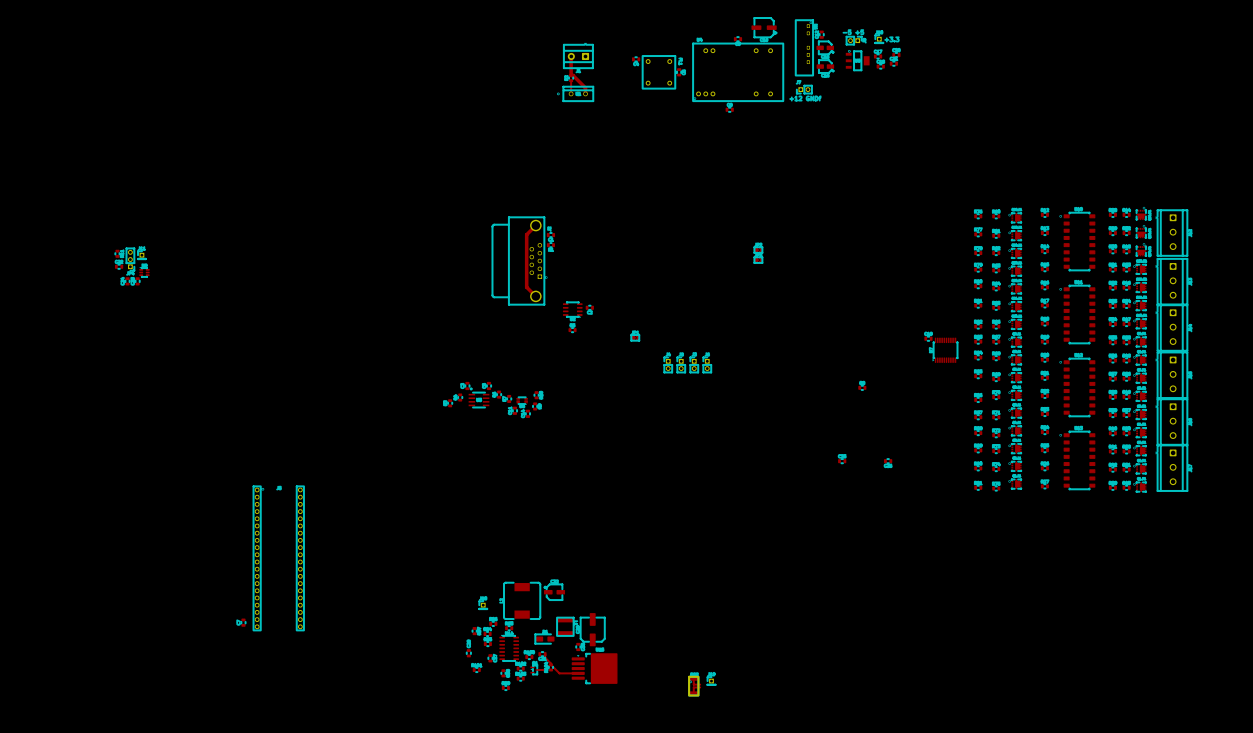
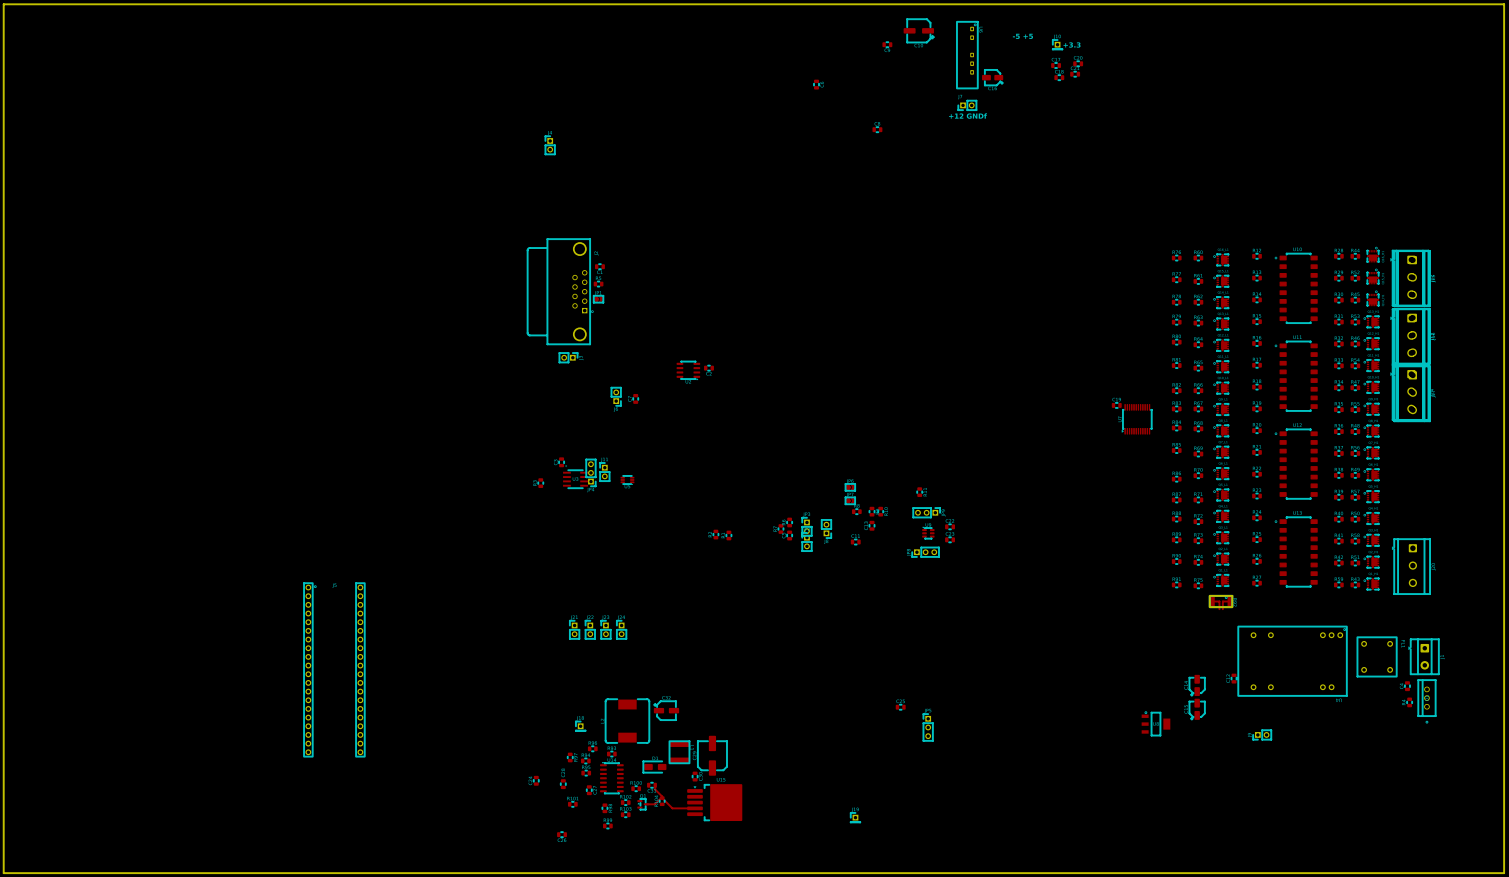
board edge: none -> (3, 4) (1504, 4) (1504, 873) (3, 873) (3, 4)
part position: (821, 34) -> (1234, 678)
part rotation: 0° (854, 40) -> 180° (1262, 734)
part position: (854, 40) -> (1262, 734)
part rotation: 0° (825, 47) -> 90° clockwise (1197, 709)
part position: (825, 47) -> (1197, 709)
part rotation: 0° (578, 55) -> 90° counterclockwise (1423, 656)
part position: (578, 55) -> (1423, 656)
track: (571, 56) (571, 75) (585, 87) (585, 93) -> none
part rotation: 0° (636, 59) -> 90° clockwise (1407, 686)
part position: (636, 59) -> (1407, 686)
part position: (857, 60) -> (1155, 723)
part position: (658, 72) -> (1377, 656)
part rotation: 0° (738, 72) -> 180° (1292, 661)
part position: (738, 72) -> (1292, 661)
part position: (571, 78) -> (715, 534)
track: (571, 80) (571, 93) -> none
part rotation: 0° (575, 93) -> 90° counterclockwise (1426, 701)
part position: (575, 93) -> (1426, 701)
track: (535, 225) (526, 234) (526, 287) (535, 296) -> none
part position: (550, 235) -> (599, 266)
part rotation: 0° (550, 245) -> 90° clockwise (728, 535)
part position: (550, 245) -> (728, 535)
part footprint: [754, 247, 763, 254] -> [802, 532, 812, 552]
part footprint: [137, 251, 147, 260] -> [599, 462, 610, 482]
part position: (117, 253) -> (919, 492)
part footprint: [754, 257, 763, 264] -> [802, 517, 812, 537]
part position: (130, 259) -> (590, 472)
part position: (519, 260) -> (560, 291)
part position: (119, 266) -> (950, 526)
part position: (144, 272) -> (928, 532)
part position: (127, 281) -> (536, 780)
part rotation: 0° (137, 281) -> 90° clockwise (950, 539)
part position: (137, 281) -> (950, 539)
part position: (572, 330) -> (598, 284)
part position: (635, 337) -> (598, 299)
part position: (668, 364) -> (550, 145)
part rotation: 0° (681, 364) -> 180° (826, 528)
part position: (681, 364) -> (826, 528)
part rotation: 0° (694, 364) -> 90° clockwise (568, 357)
part position: (694, 364) -> (568, 357)
part rotation: 0° (707, 364) -> 180° (616, 396)
part position: (707, 364) -> (616, 396)
part position: (1171, 375) -> (1411, 278)
part position: (489, 385) -> (789, 535)
part position: (862, 387) -> (856, 511)
part position: (499, 394) -> (789, 522)
part position: (536, 395) -> (880, 511)
part position: (460, 397) -> (1409, 702)
part position: (509, 398) -> (780, 528)
part position: (535, 406) -> (872, 511)
part: none -> (850, 487)
part footprint: [525, 409, 531, 418] -> [1189, 674, 1206, 697]
part rotation: 0° (514, 410) -> 90° clockwise (855, 542)
part position: (514, 410) -> (855, 542)
part: none -> (850, 500)
part position: (1171, 422) -> (1411, 336)
part: none -> (926, 512)
part: none -> (872, 525)
part: none -> (925, 552)
part position: (842, 461) -> (900, 707)
part position: (888, 461) -> (562, 834)
part position: (1171, 468) -> (1411, 393)
part: none -> (1411, 566)
part: none -> (574, 629)
part: none -> (590, 629)
part: none -> (605, 629)
part: none -> (621, 629)
part: none -> (928, 727)
part position: (243, 622) -> (635, 398)
part rotation: 0° (694, 686) -> 90° clockwise (1221, 602)
part position: (694, 686) -> (1221, 602)

